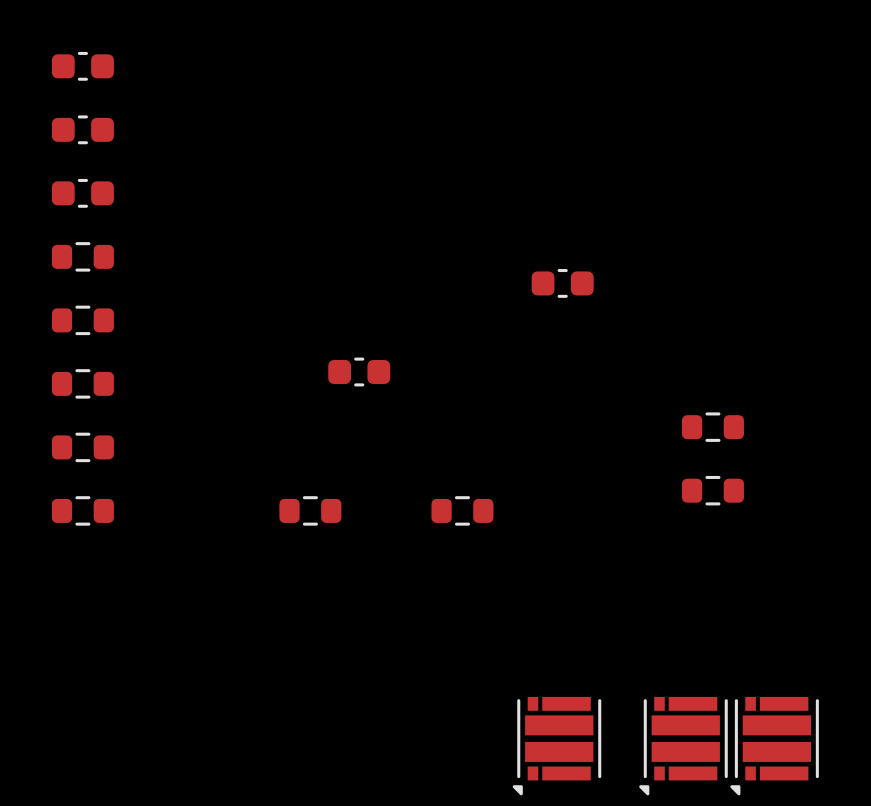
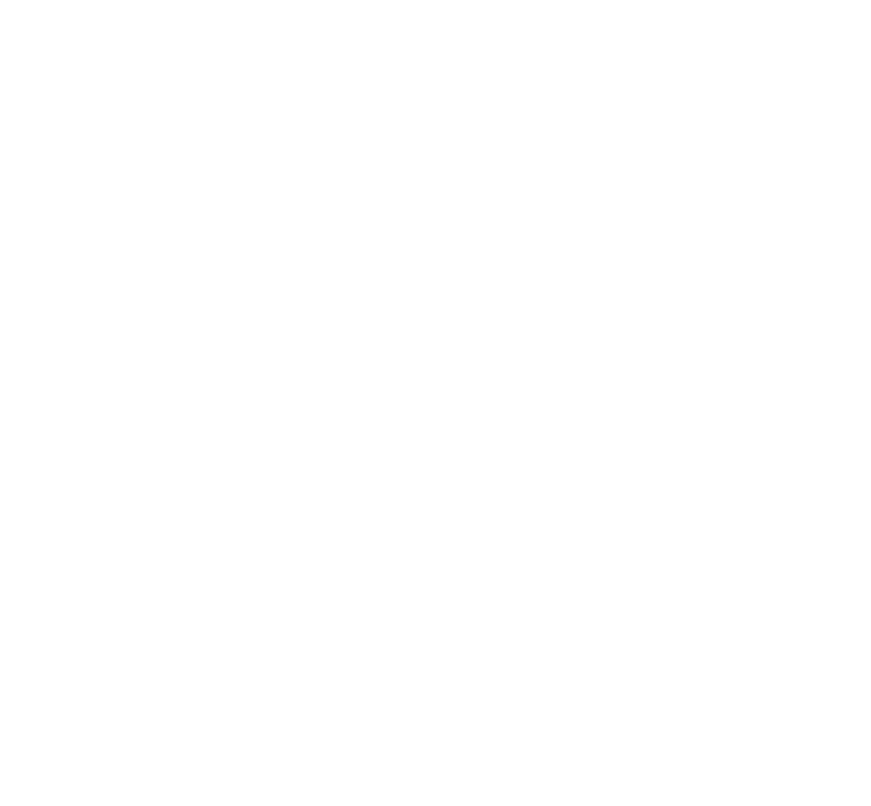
part: (82, 66) -> none
part: (82, 129) -> none
part: (82, 193) -> none
part: (82, 256) -> none
part: (562, 283) -> none
part: (82, 320) -> none
part: (359, 372) -> none
part: (82, 383) -> none
part: (712, 427) -> none
part: (82, 447) -> none
part: (712, 490) -> none
part: (82, 510) -> none
part: (310, 510) -> none
part: (462, 510) -> none
part: (556, 746) -> none
part: (683, 746) -> none
part: (774, 746) -> none

